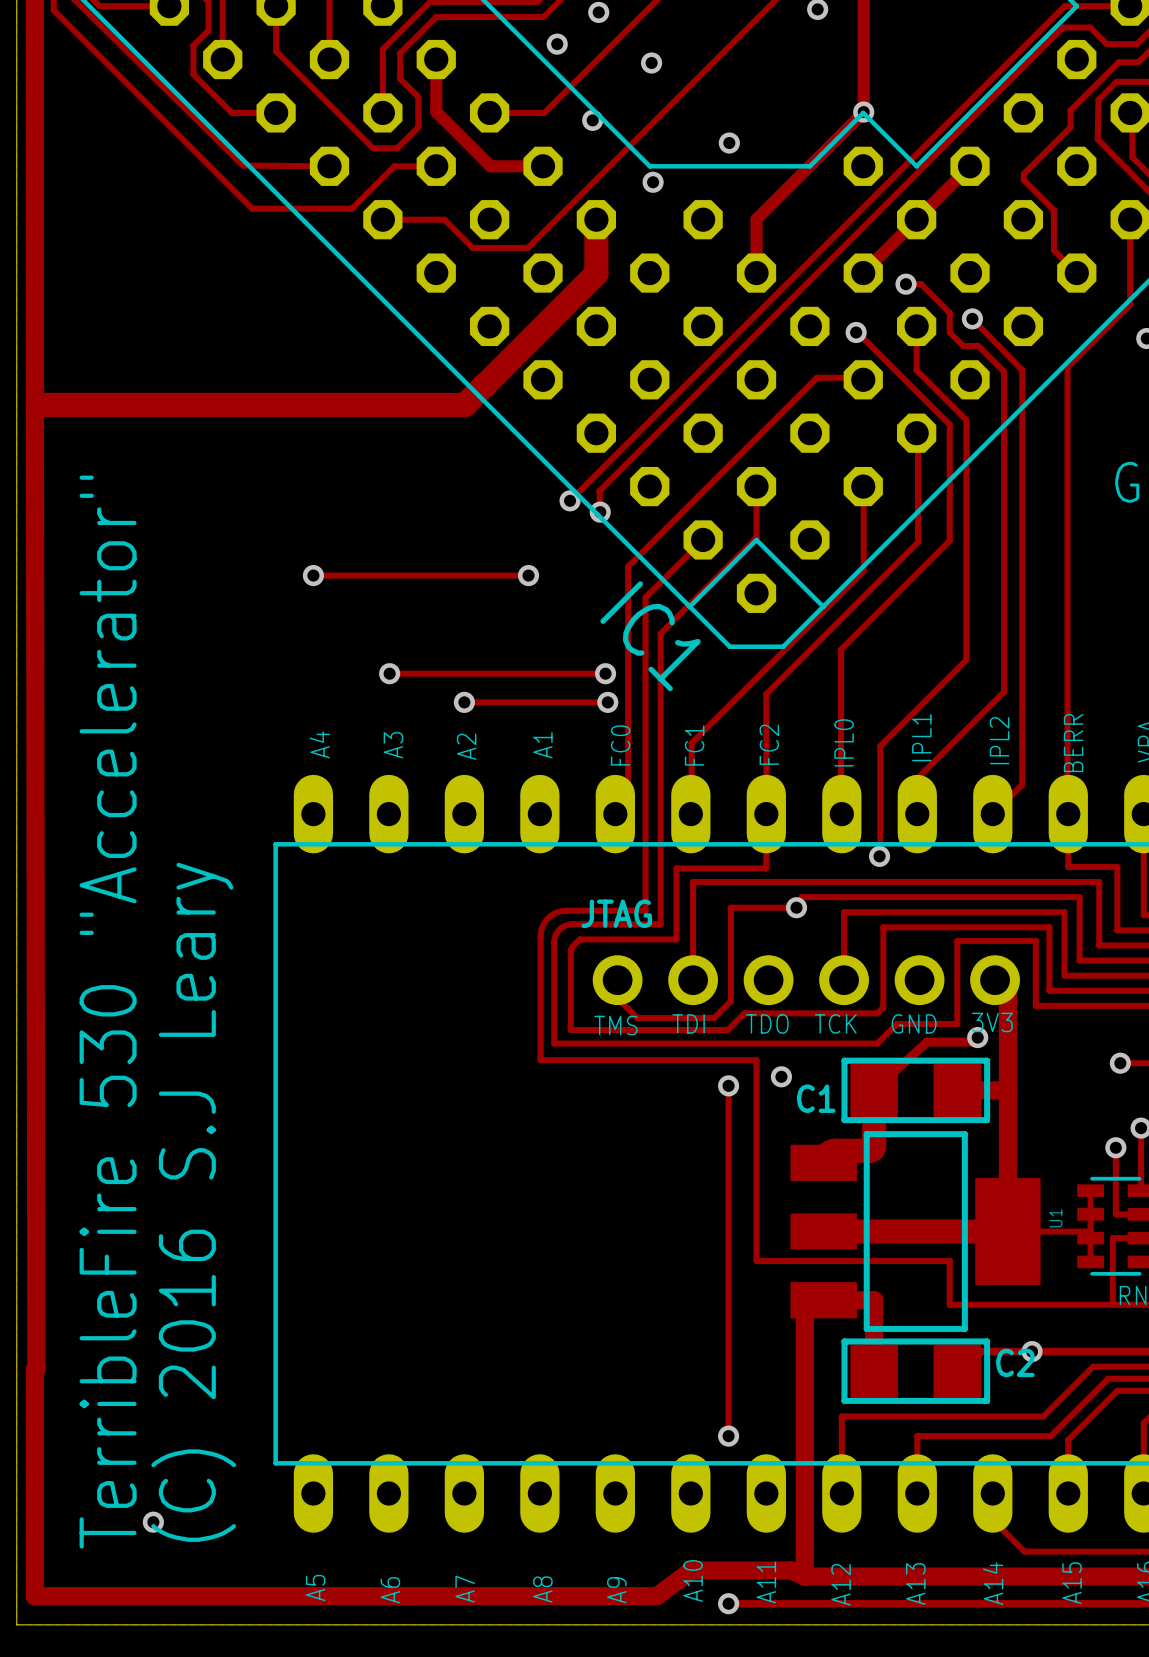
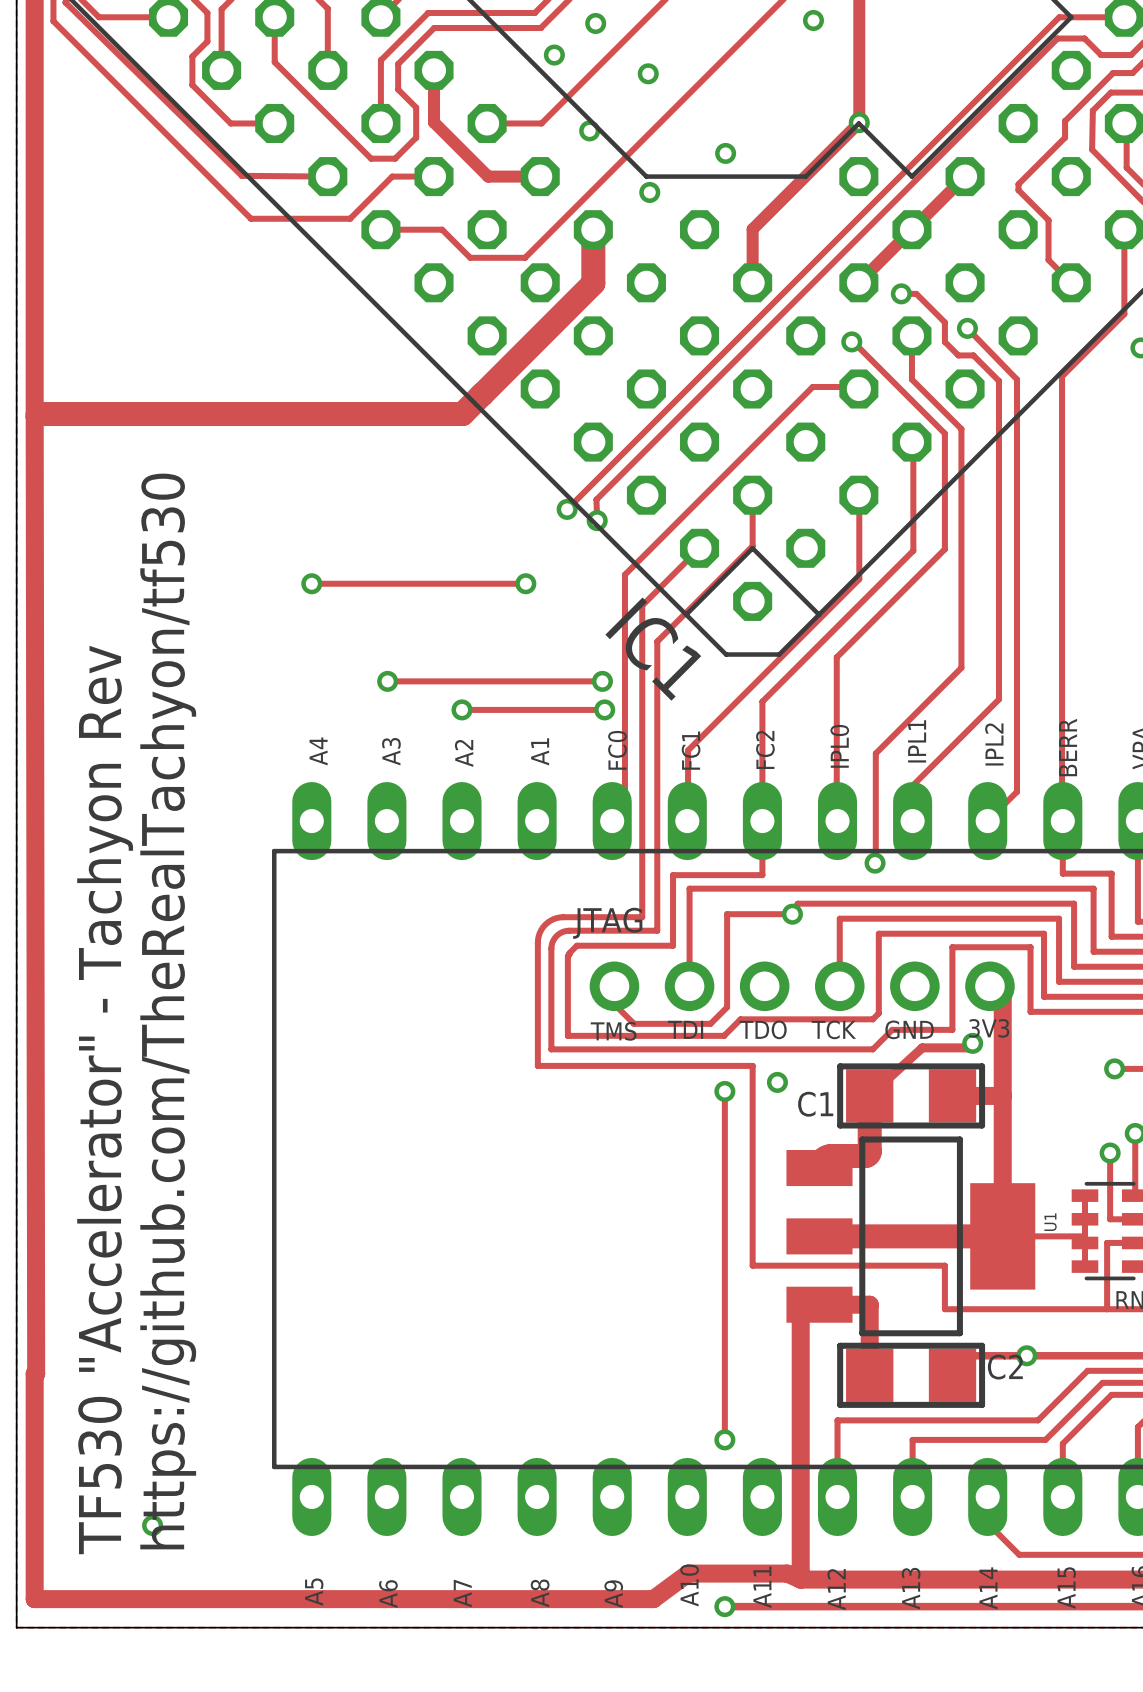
text: none -> https://github.com/TheRealTachyon/tf530 (168, 1011)
text: TerribleFire 530 "Accelerator" (108, 1012) -> TF530 "Accelerator" - Tachyon Rev (105, 1099)
text: (C) 2016 S.J Leary (193, 1202) -> none

